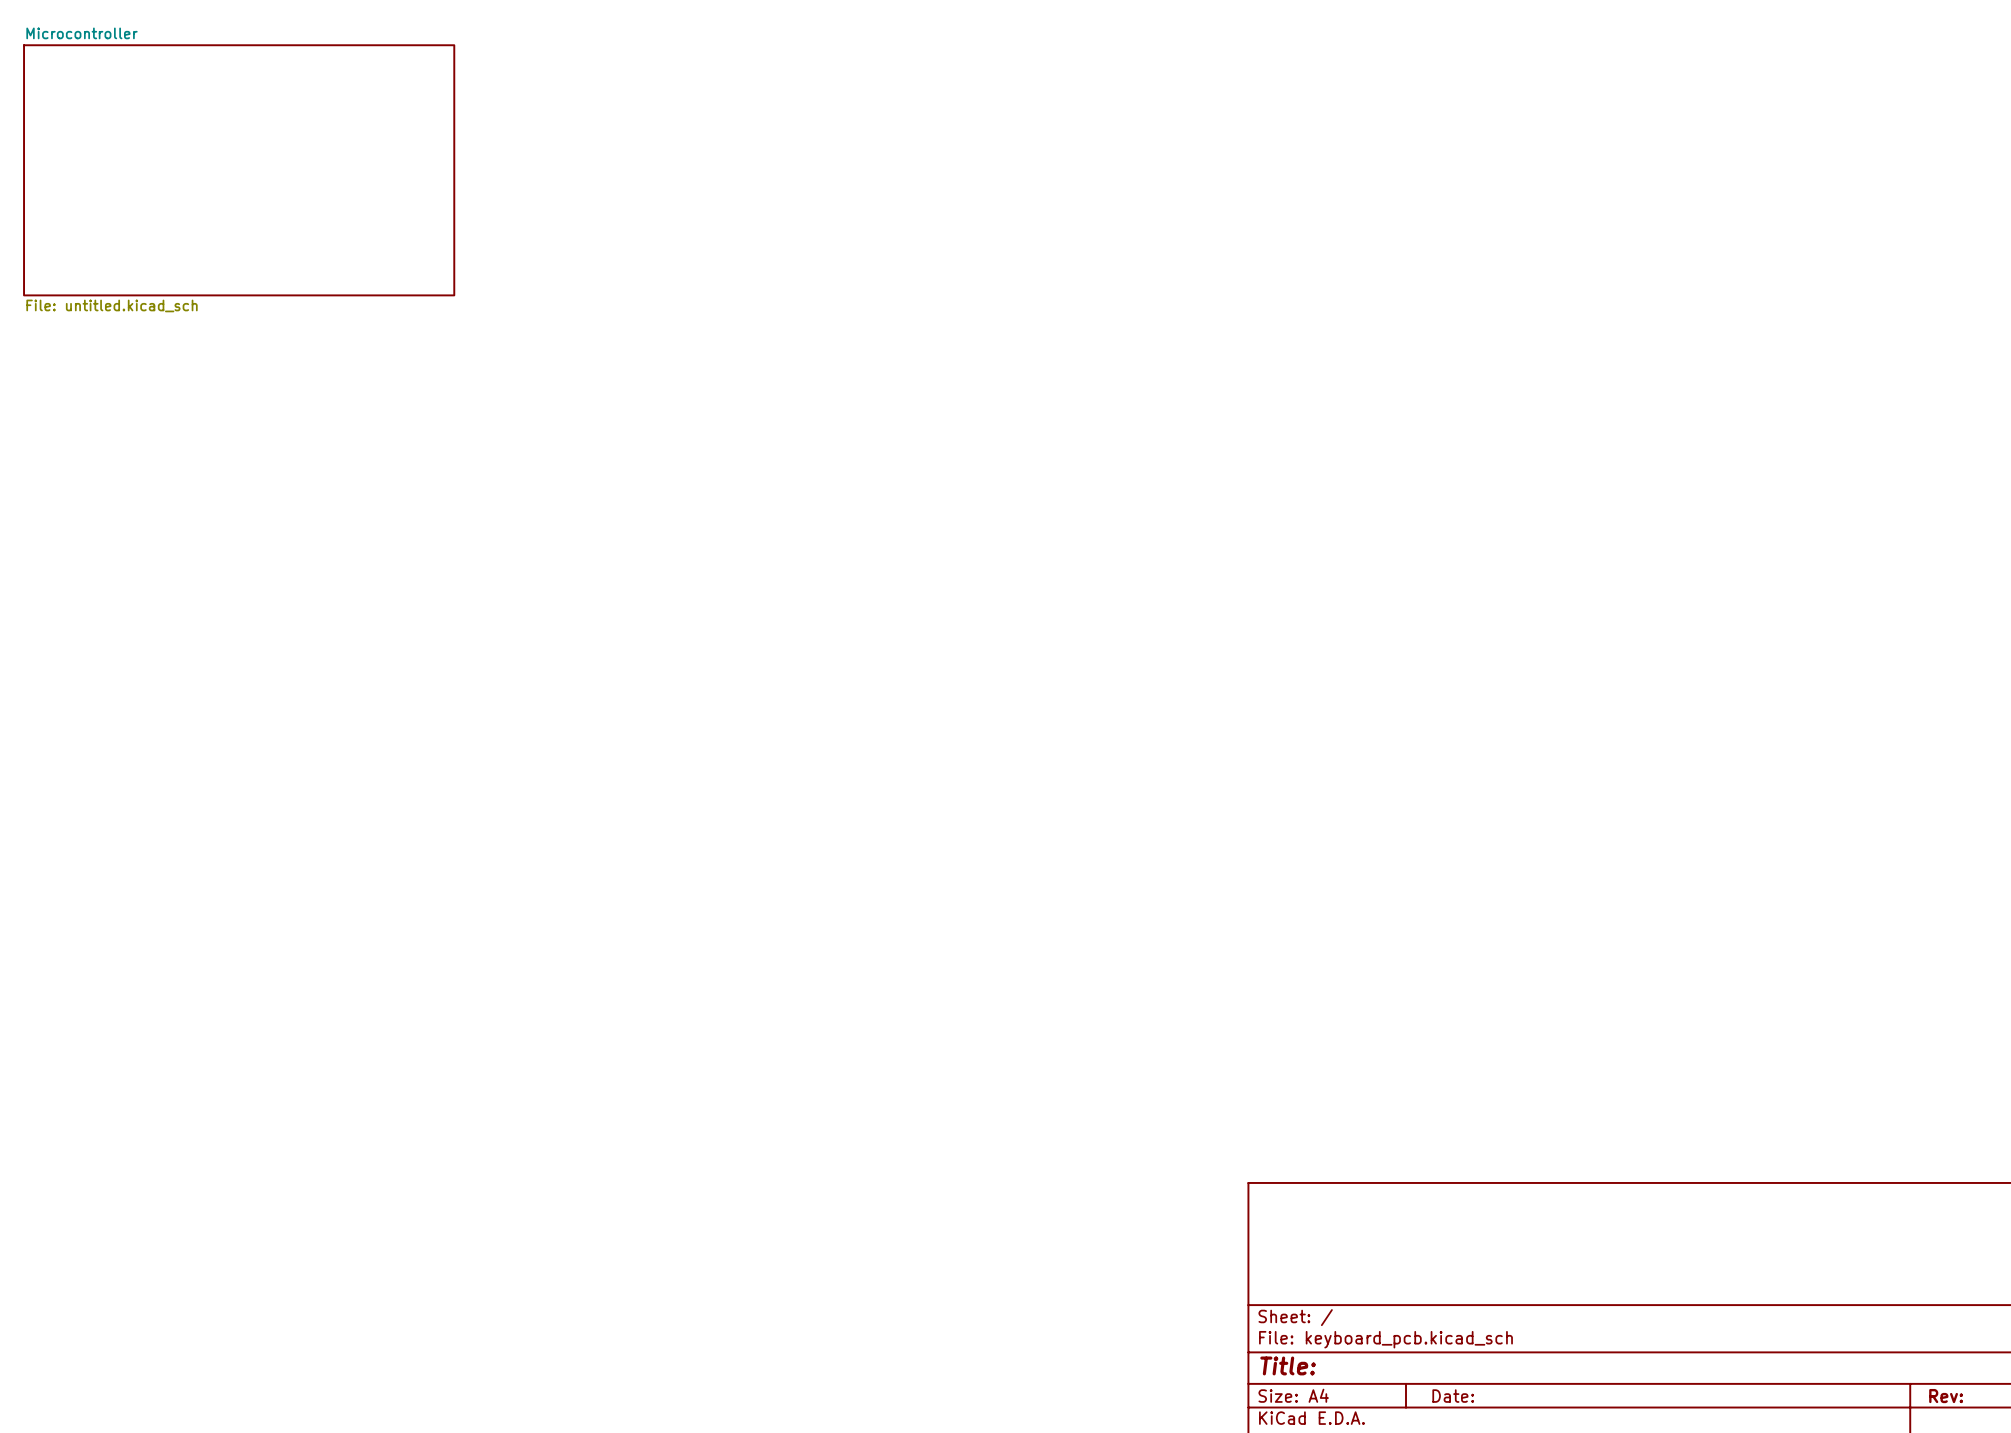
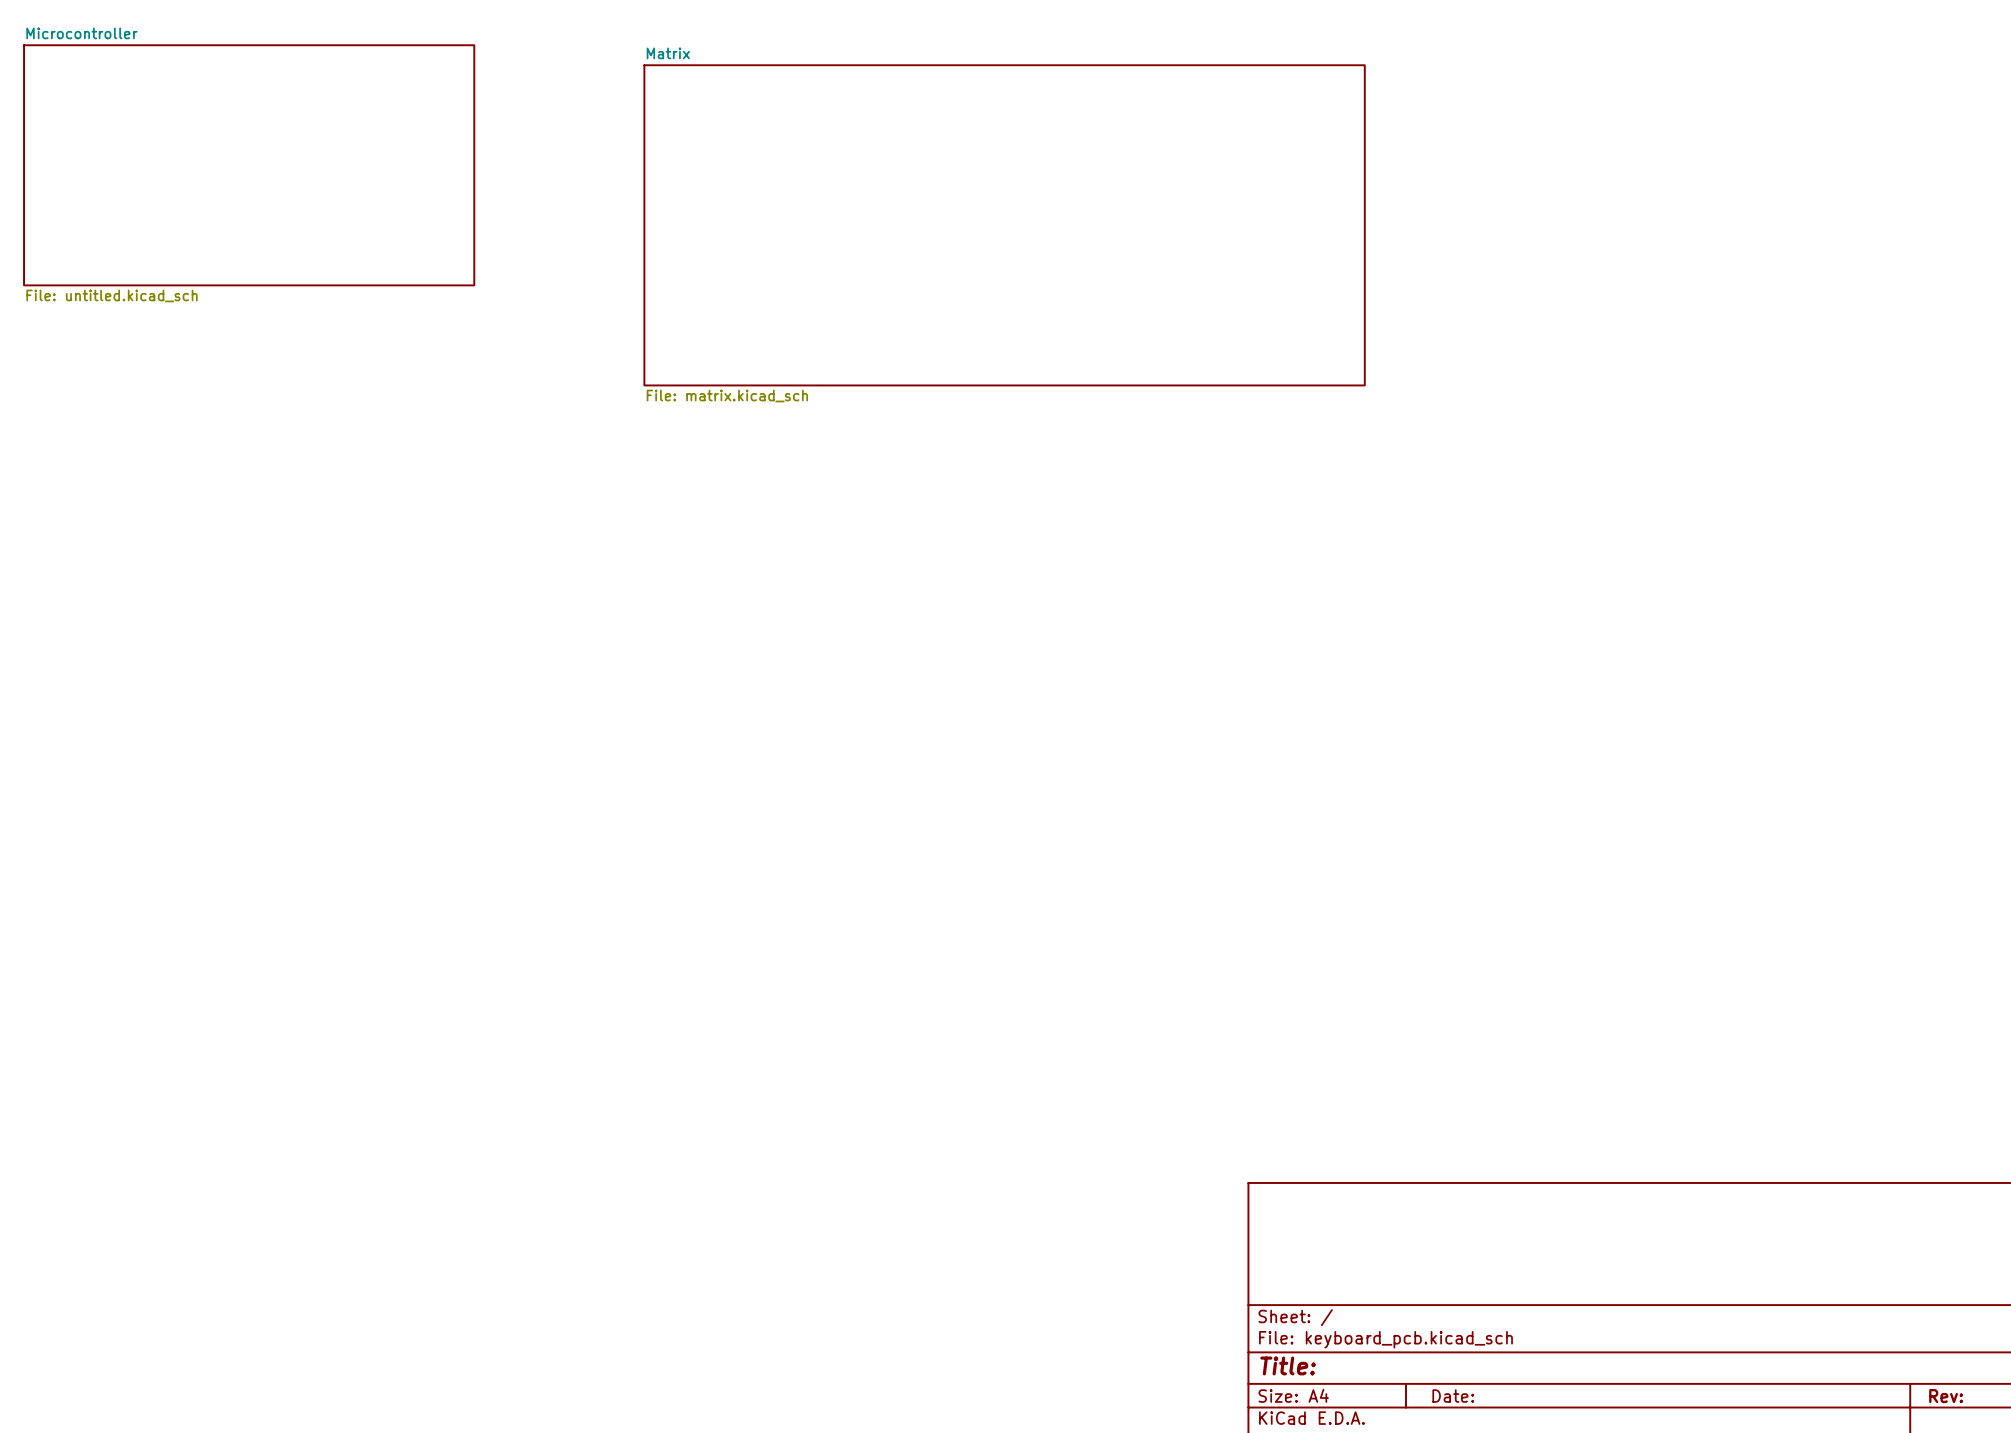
sheet Microcontroller: none -> File: untitled.kicad_sch (249, 165)
sheet Microcontroller: File: untitled.kicad_sch (239, 170) -> none
sheet Matrix: none -> File: matrix.kicad_sch (1004, 225)

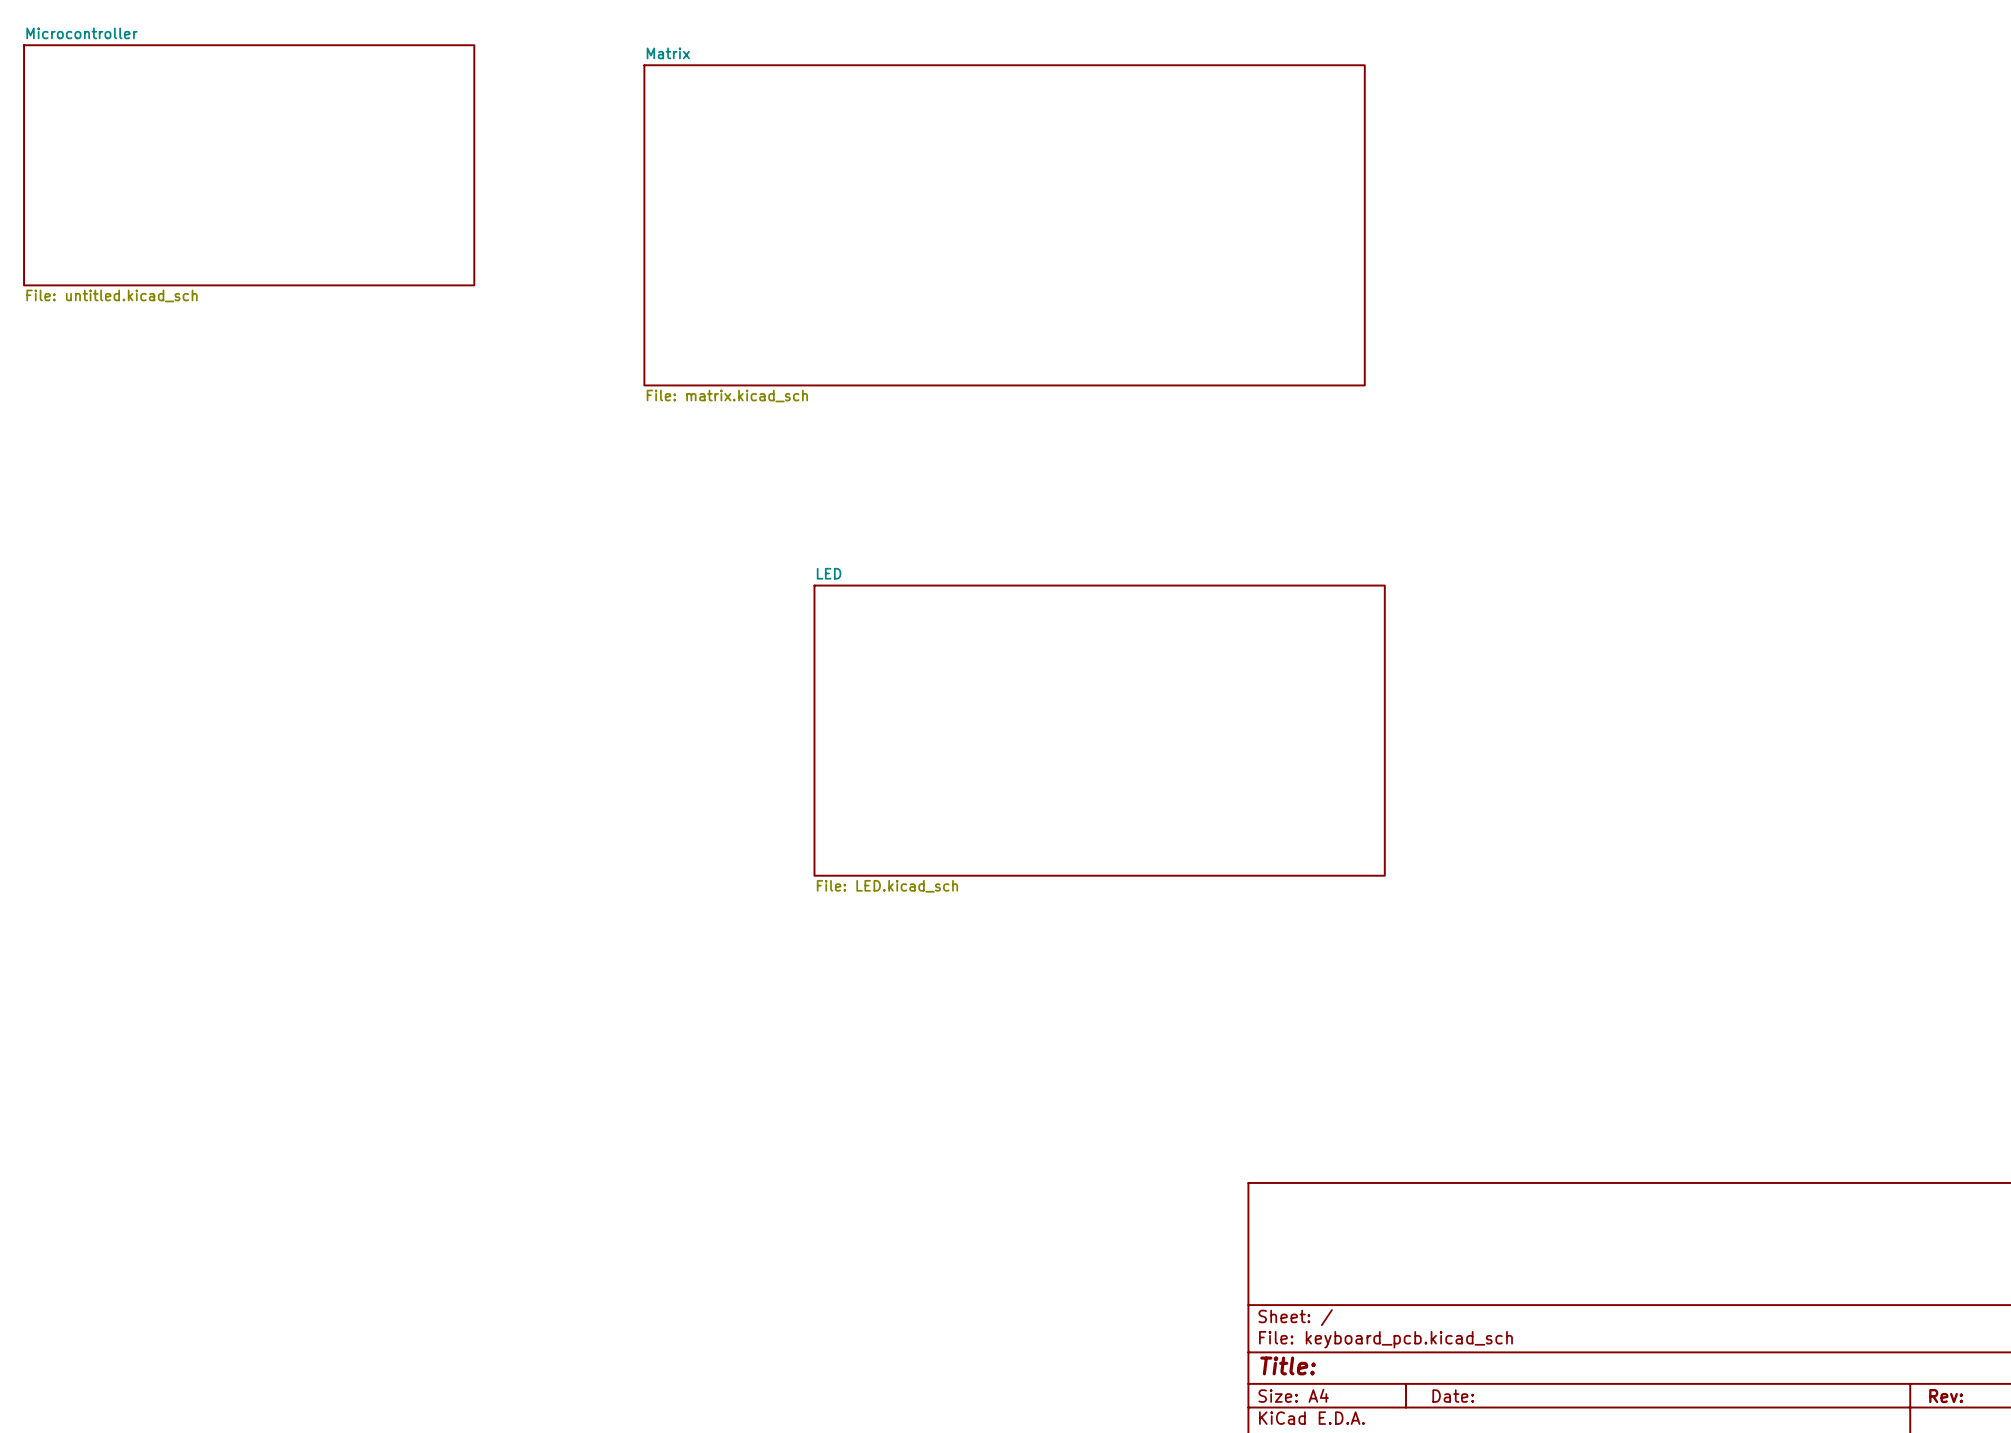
sheet LED: none -> File: LED.kicad_sch (1099, 730)

